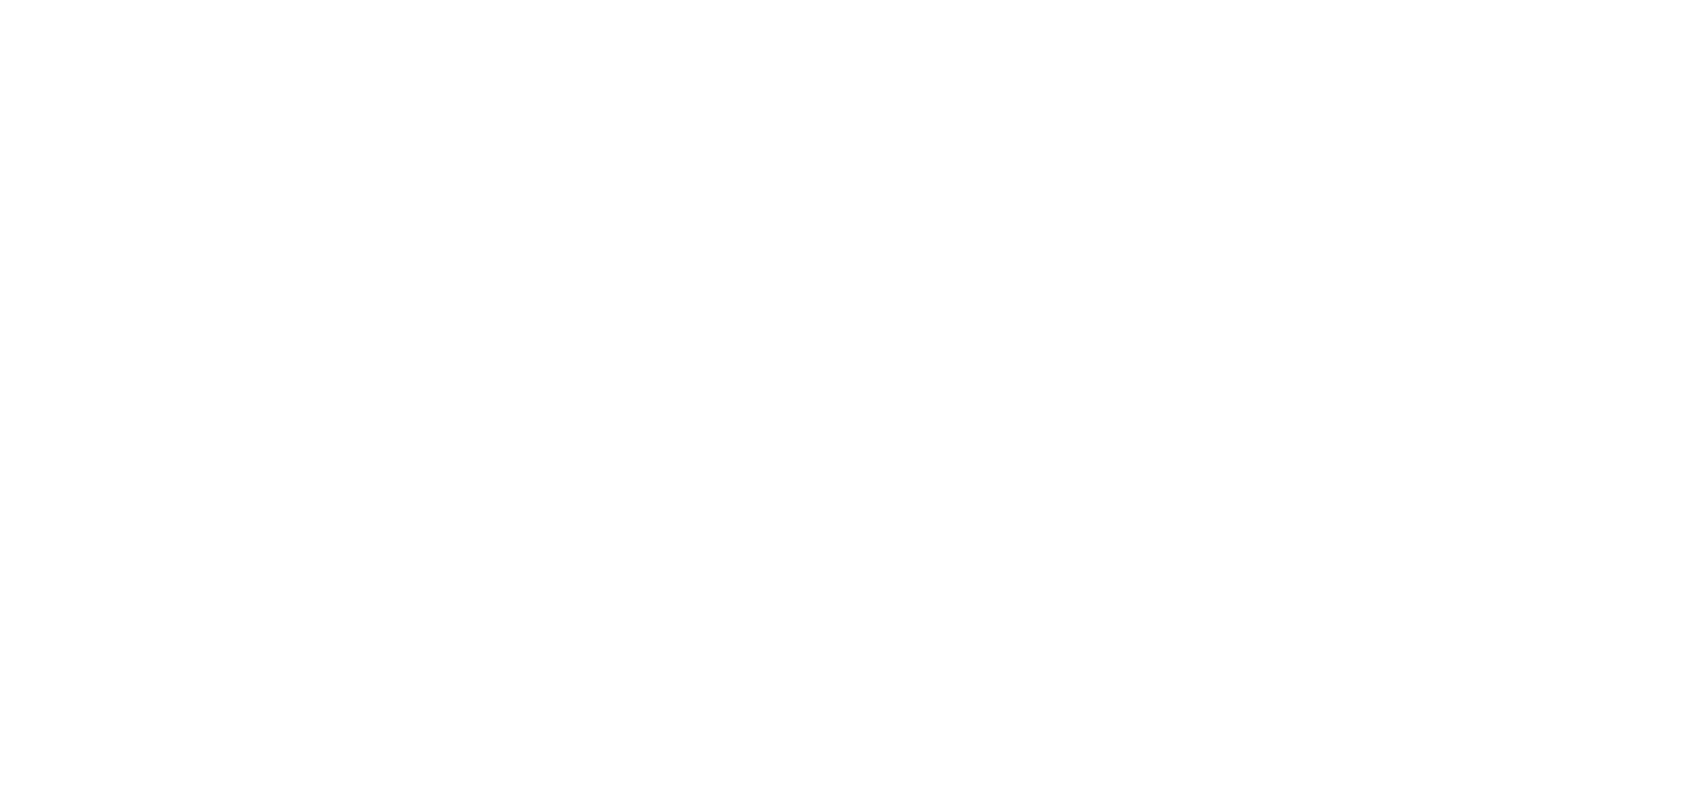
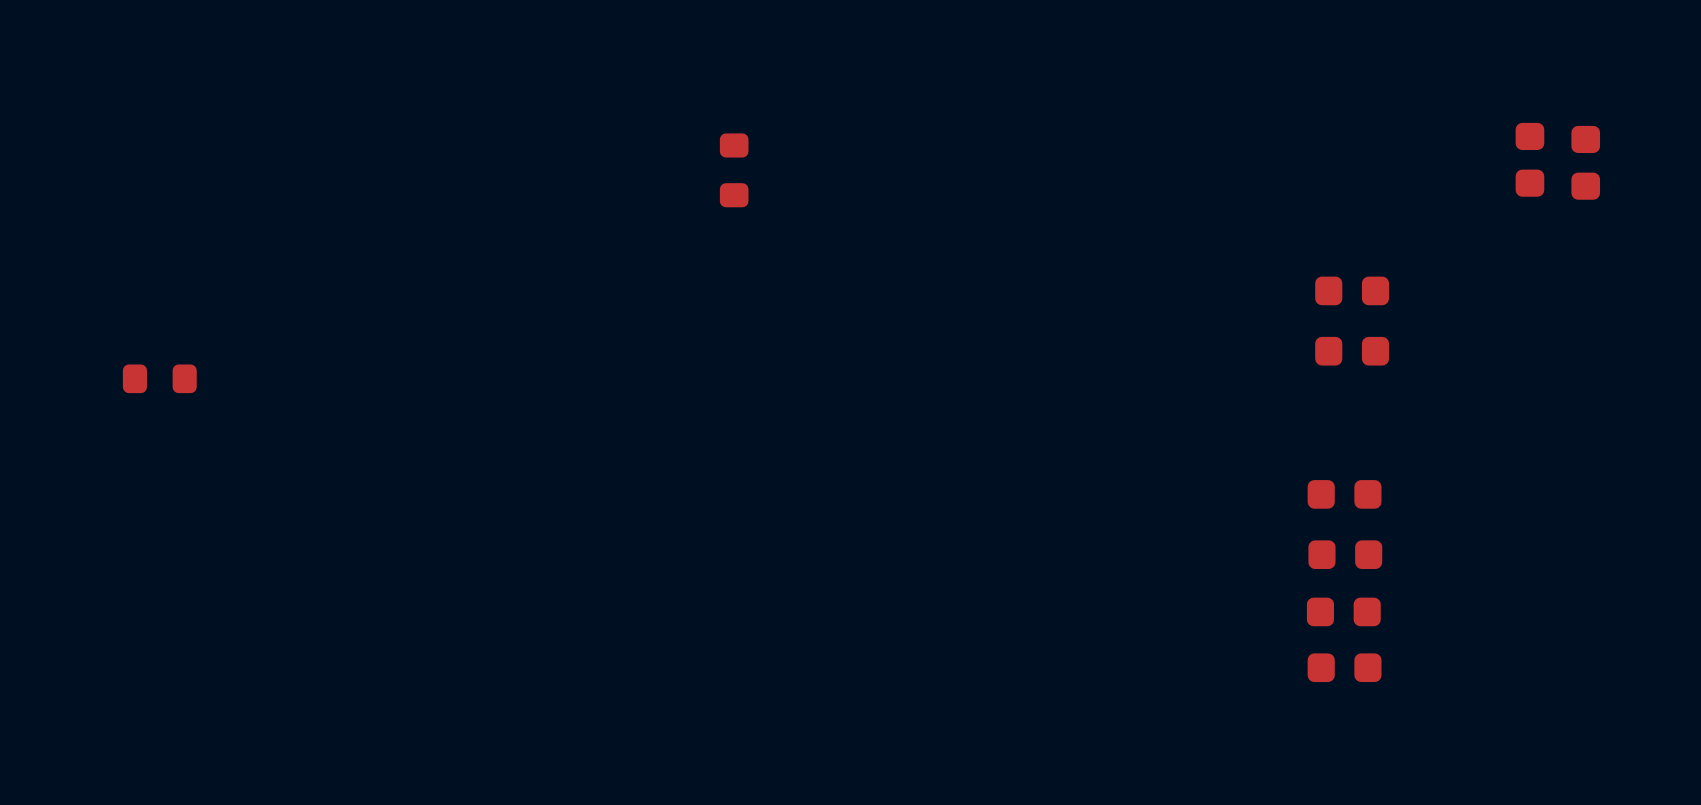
part: none -> (1529, 159)
part: none -> (1585, 162)
part: none -> (734, 170)
part: none -> (1352, 290)
part: none -> (1352, 351)
part: none -> (159, 378)
part: none -> (1344, 494)
part: none -> (1345, 554)
part: none -> (1343, 611)
part: none -> (1344, 667)

